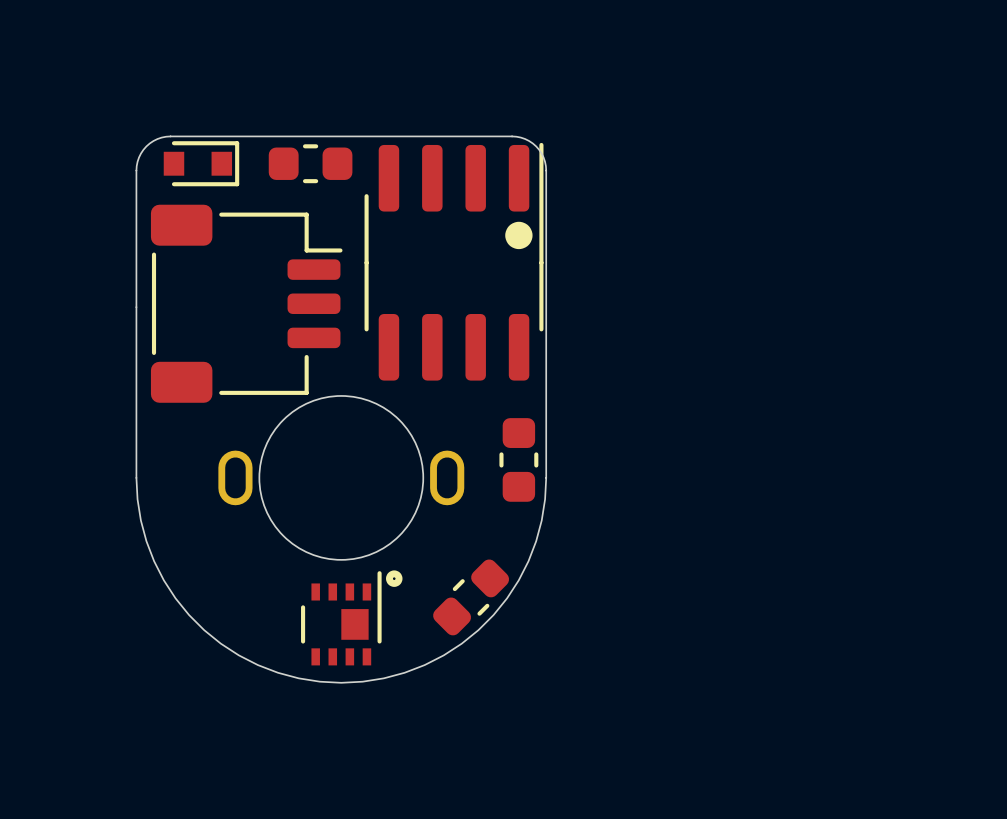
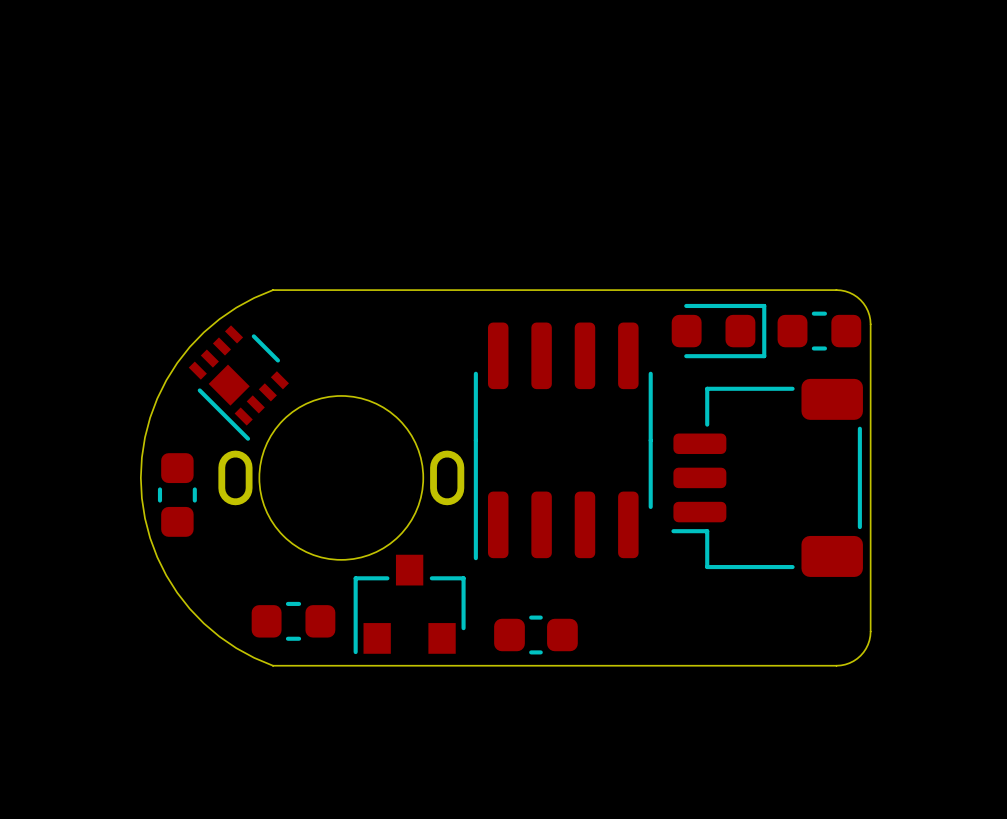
board edge: (170, 136) (512, 136) (525, 139) (532, 143) (543, 157) (546, 170) (546, 477) (541, 520) (528, 561) (507, 598) (478, 630) (461, 643) (424, 665) (383, 678) (341, 682) (298, 678) (278, 672) (238, 655) (204, 630) (175, 598) (154, 561) (140, 520) (136, 477) (136, 170) (139, 157) (146, 146) (157, 139) (170, 136) -> none
part: (201, 163) -> none
part: (310, 163) -> none
drawing: [505, 221, 533, 250] -> none
part rotation: 0° (454, 261) -> 180° (563, 441)
part position: (454, 261) -> (563, 441)
board edge: none -> (273, 290) (836, 290) (853, 294) (866, 307) (870, 324) (870, 631) (866, 648) (853, 661) (836, 665) (273, 665) (236, 648) (203, 623) (177, 592) (166, 575) (157, 557) (145, 518) (141, 498) (141, 457) (145, 437) (157, 398) (177, 363) (189, 347) (203, 332) (236, 307) (273, 290)
part rotation: 0° (246, 303) -> 180° (767, 477)
part position: (246, 303) -> (767, 477)
part: none -> (719, 331)
part: none -> (819, 331)
part: none -> (238, 383)
part: (518, 459) -> none
part: none -> (177, 494)
drawing: [386, 570, 403, 587] -> none
part: (471, 597) -> none
part: none -> (409, 604)
part: (341, 618) -> none
part: none -> (293, 621)
part: none -> (535, 635)

